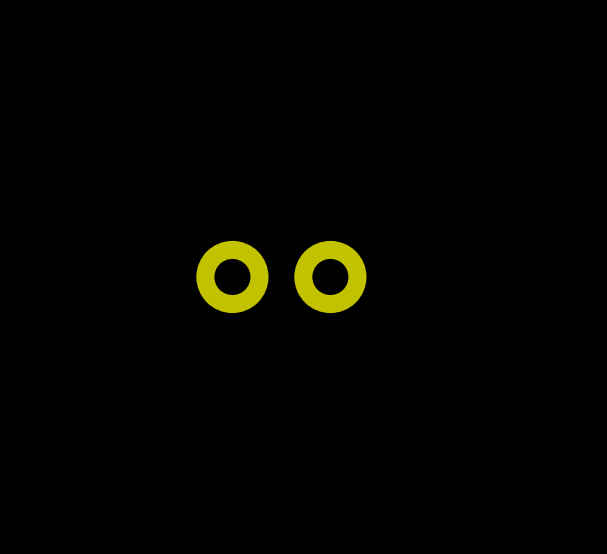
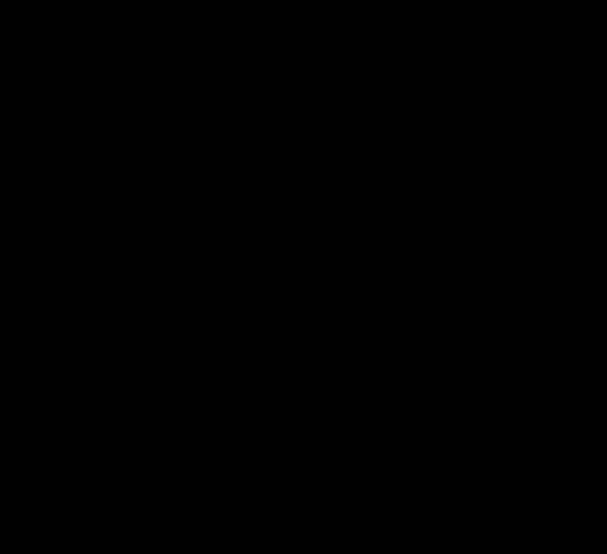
part: (281, 276) -> none

